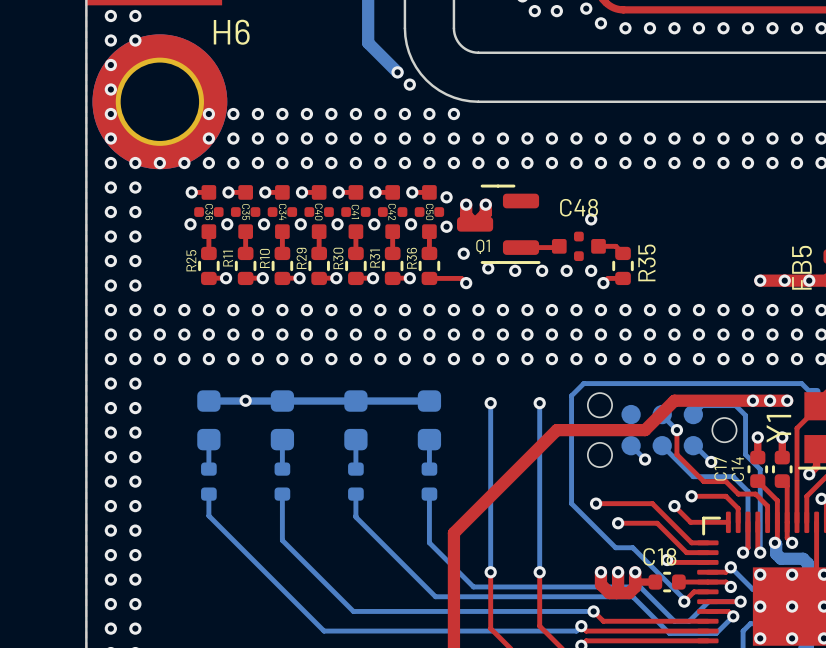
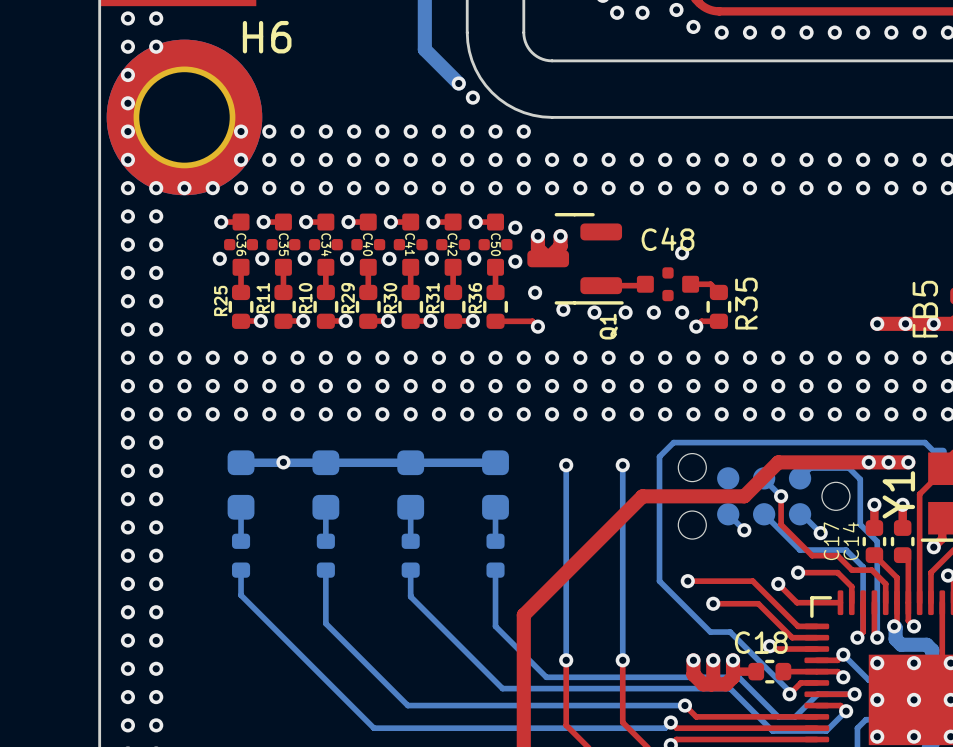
Q1 name rotation: 0° (483, 246) -> 90° counterclockwise (608, 326)
Q1 name position: Q1 (483, 246) -> Q1 (608, 326)

